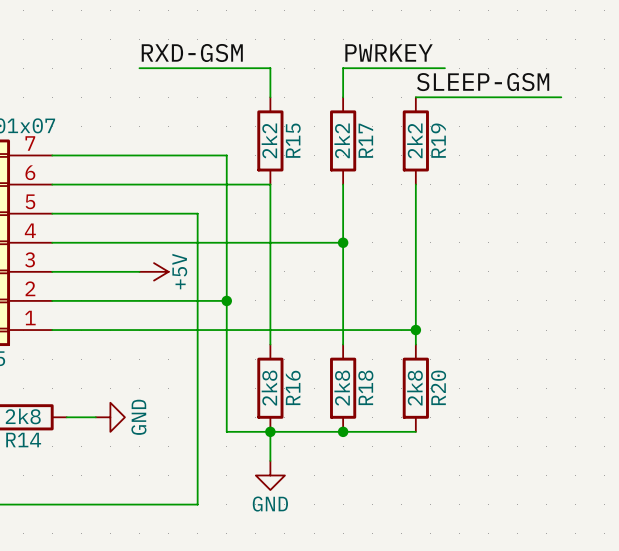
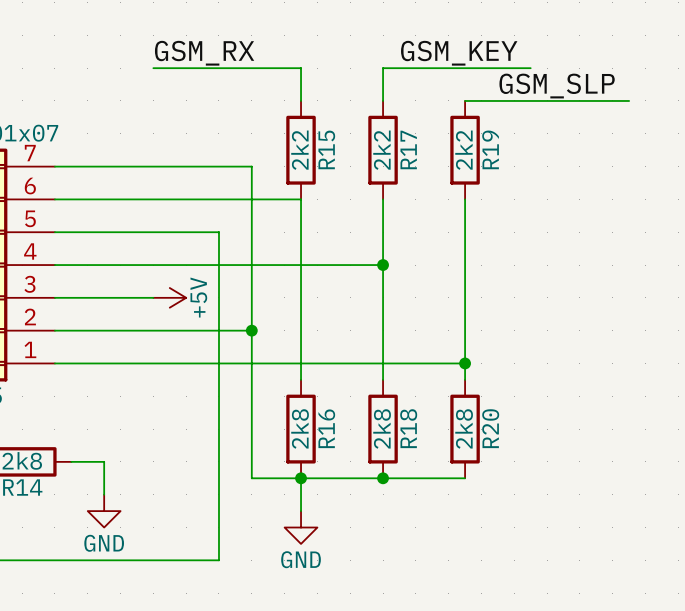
label: RXD-GSM (192, 52) -> GSM_RX (204, 53)
label: PWRKEY (389, 52) -> none
label: none -> GSM_KEY (459, 53)
wire: none -> (497, 68) (530, 68)
label: SLEEP-GSM (483, 82) -> none
label: none -> GSM_SLP (557, 86)
wire: none -> (104, 461) (104, 494)
power symbol rotation: 0° (110, 417) -> 90° clockwise (104, 511)
power symbol position: GND (110, 417) -> GND (104, 511)

